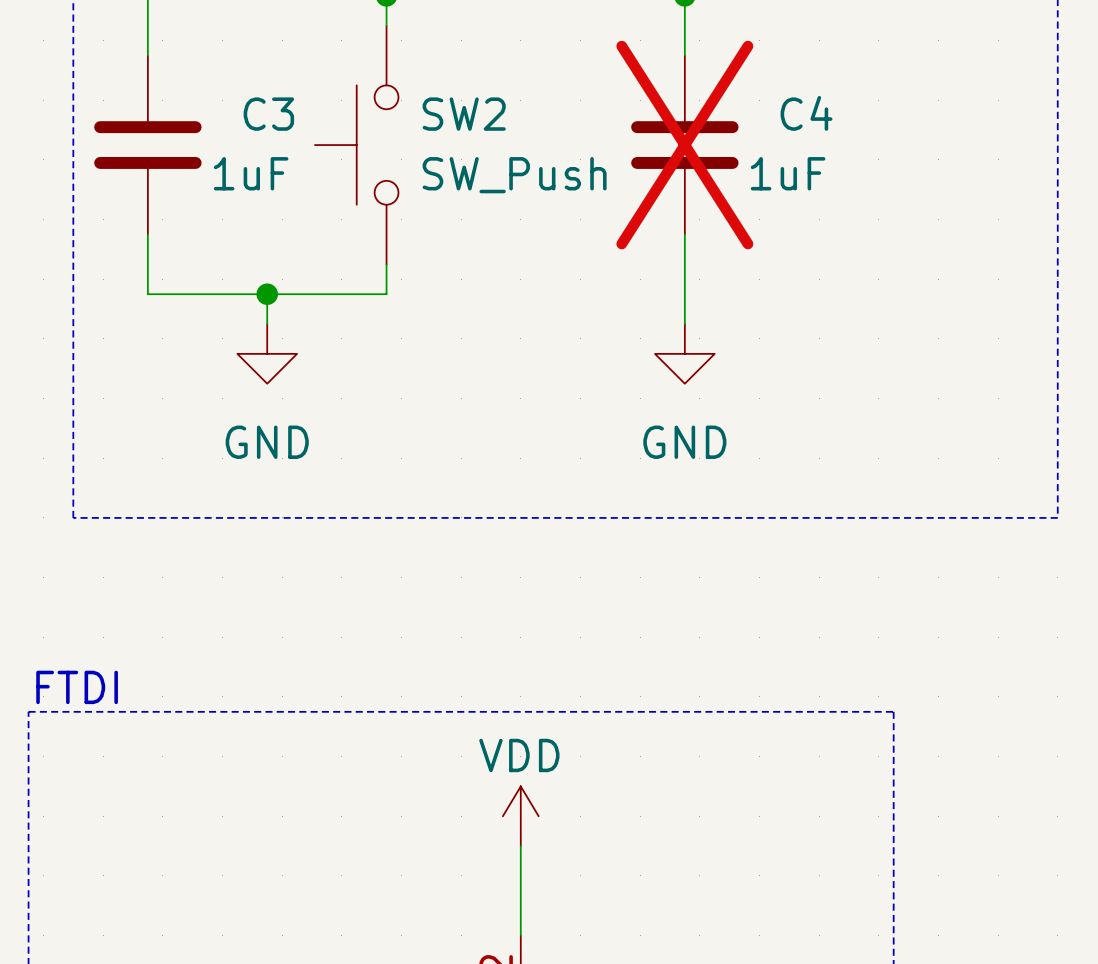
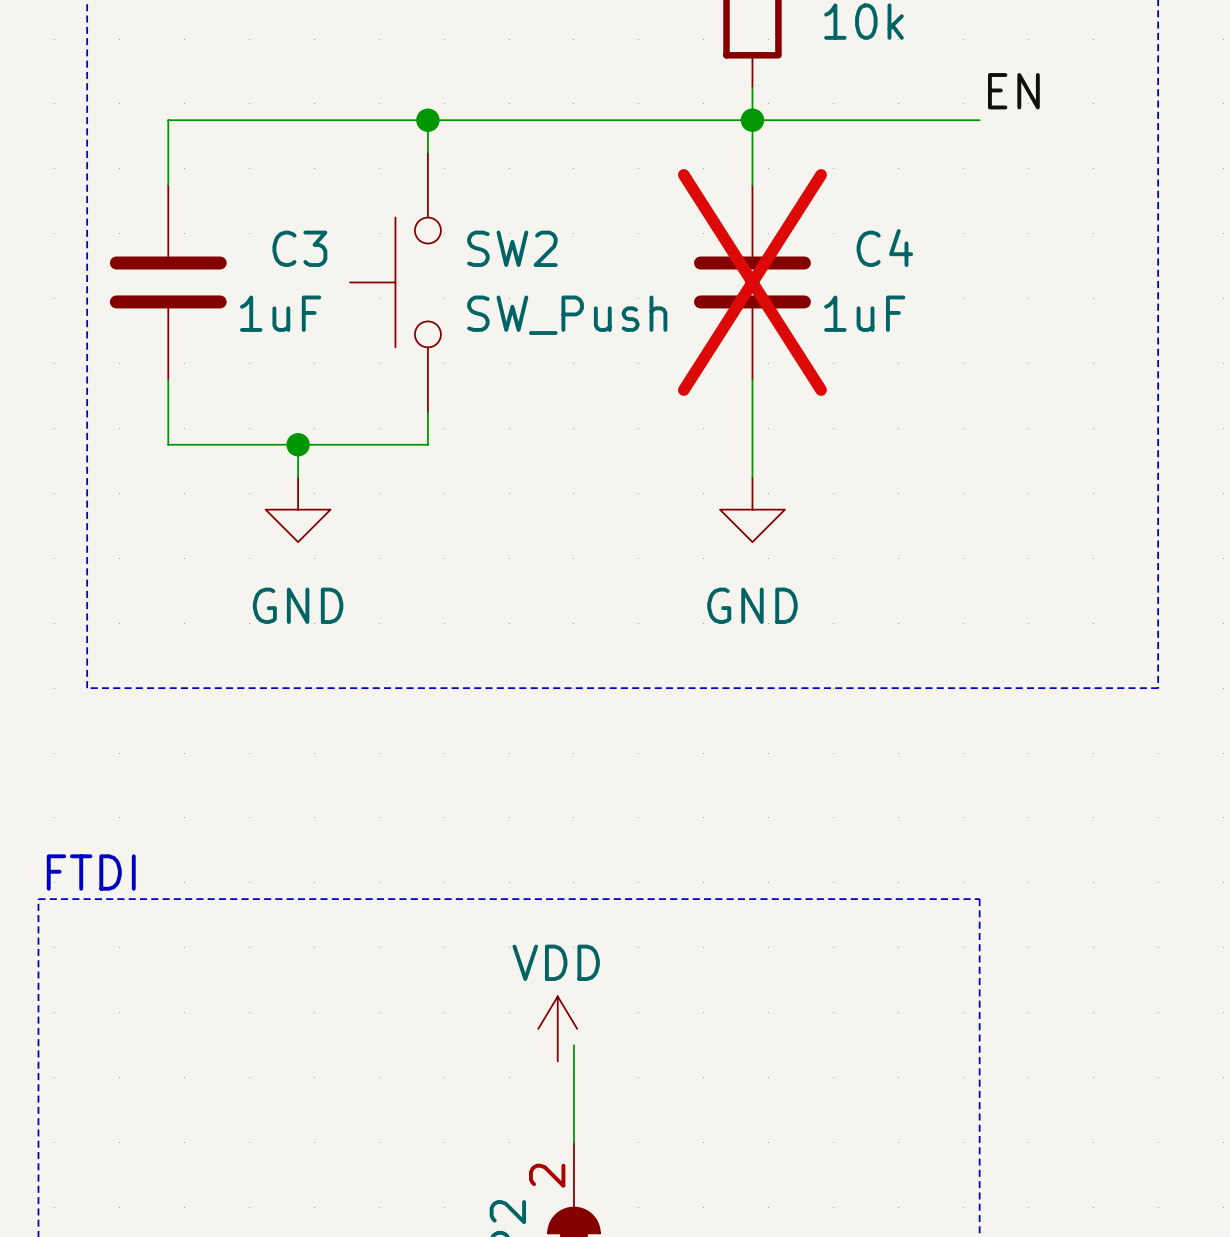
power symbol position: VDD (520, 816) -> VDD (557, 1028)

